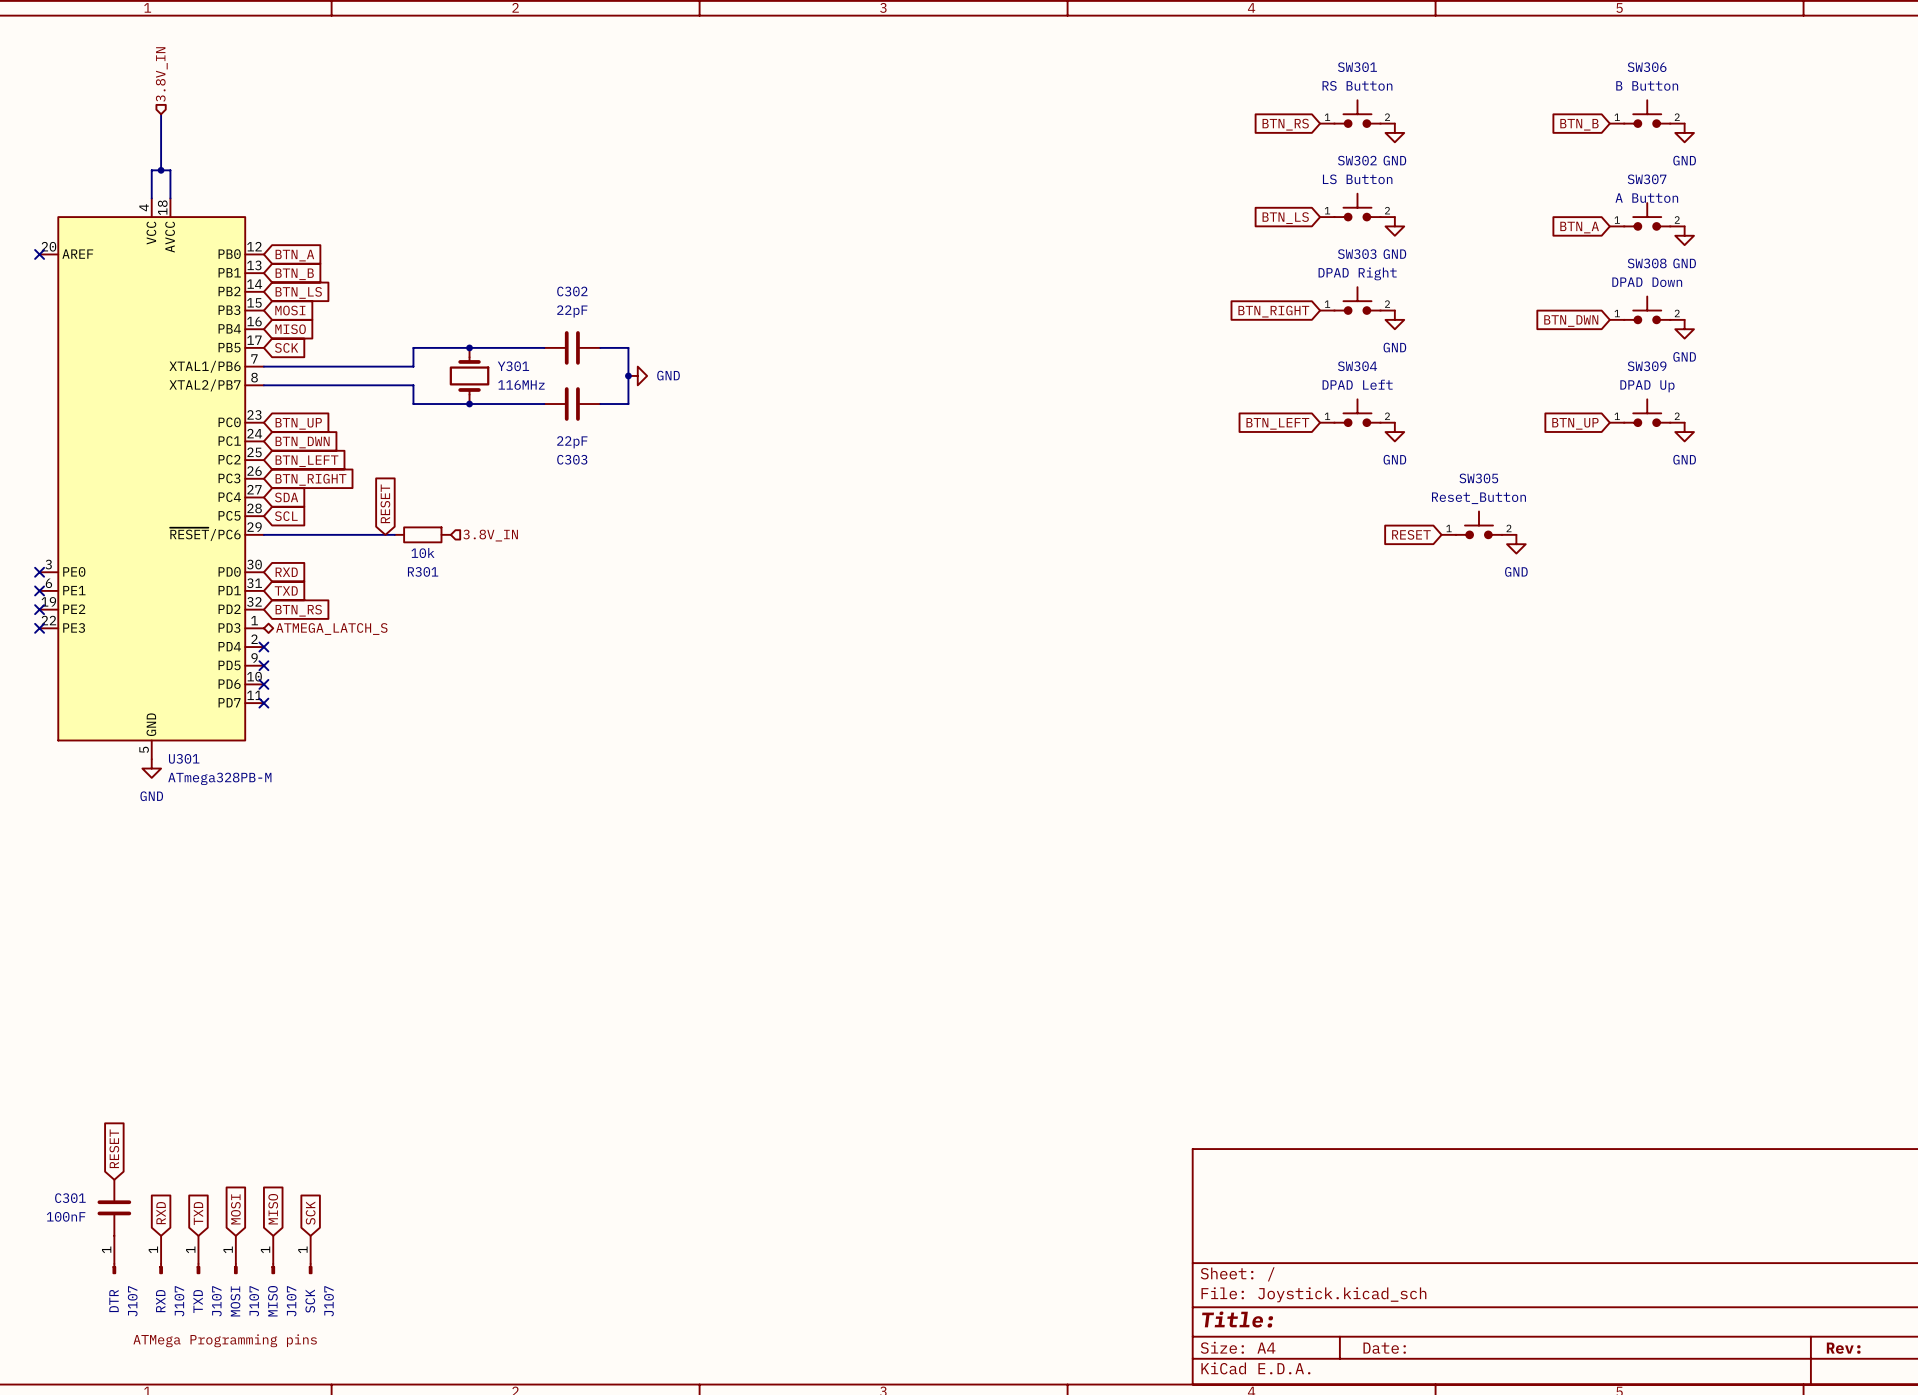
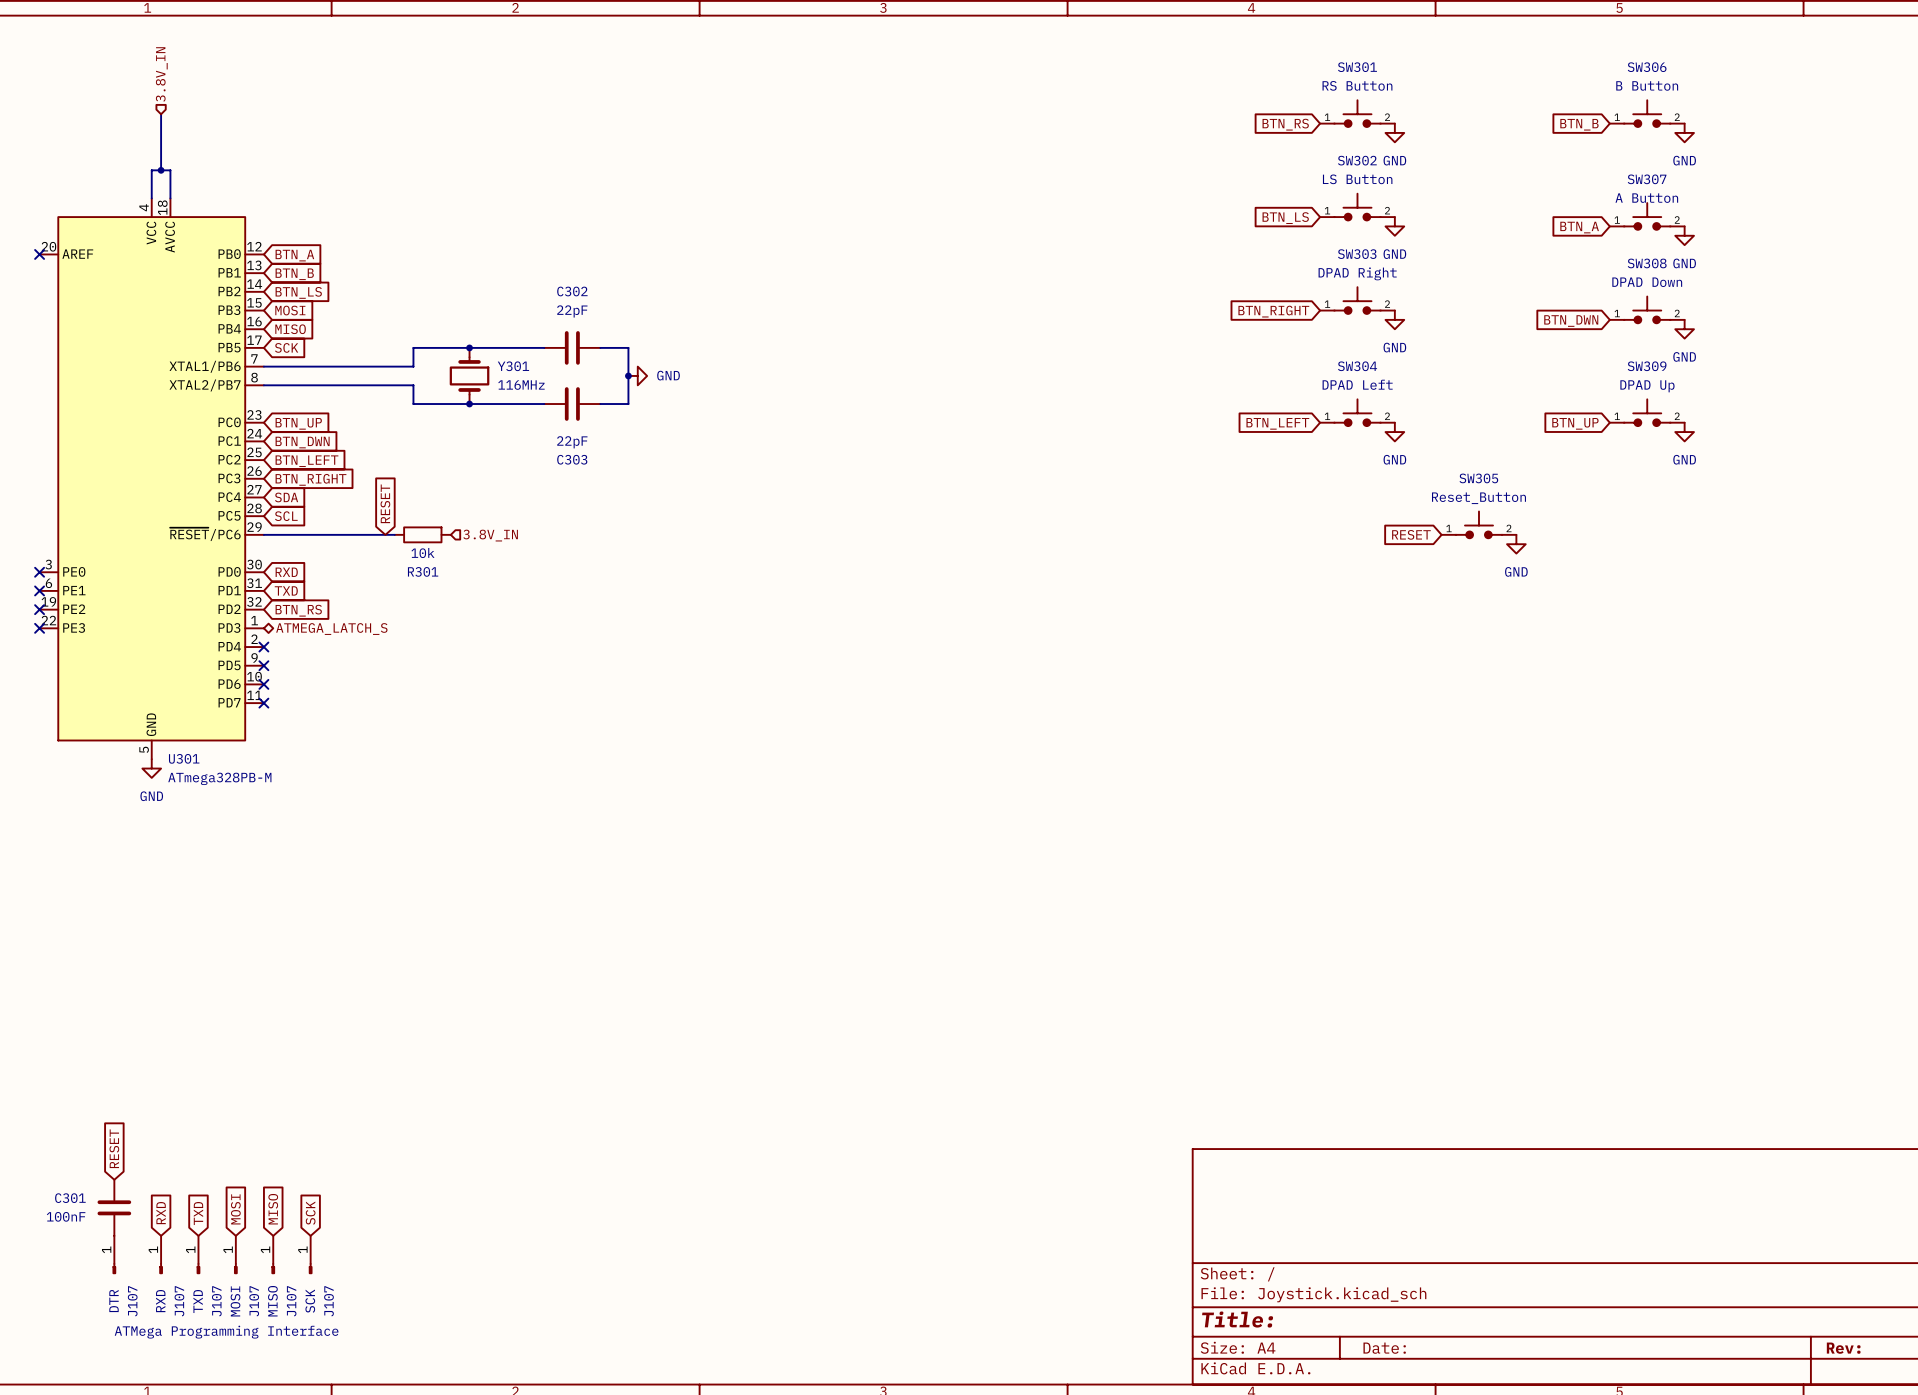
text: none -> ATMega Programming Interface (226, 1332)
label: ATMega Programming pins (225, 1340) -> none

